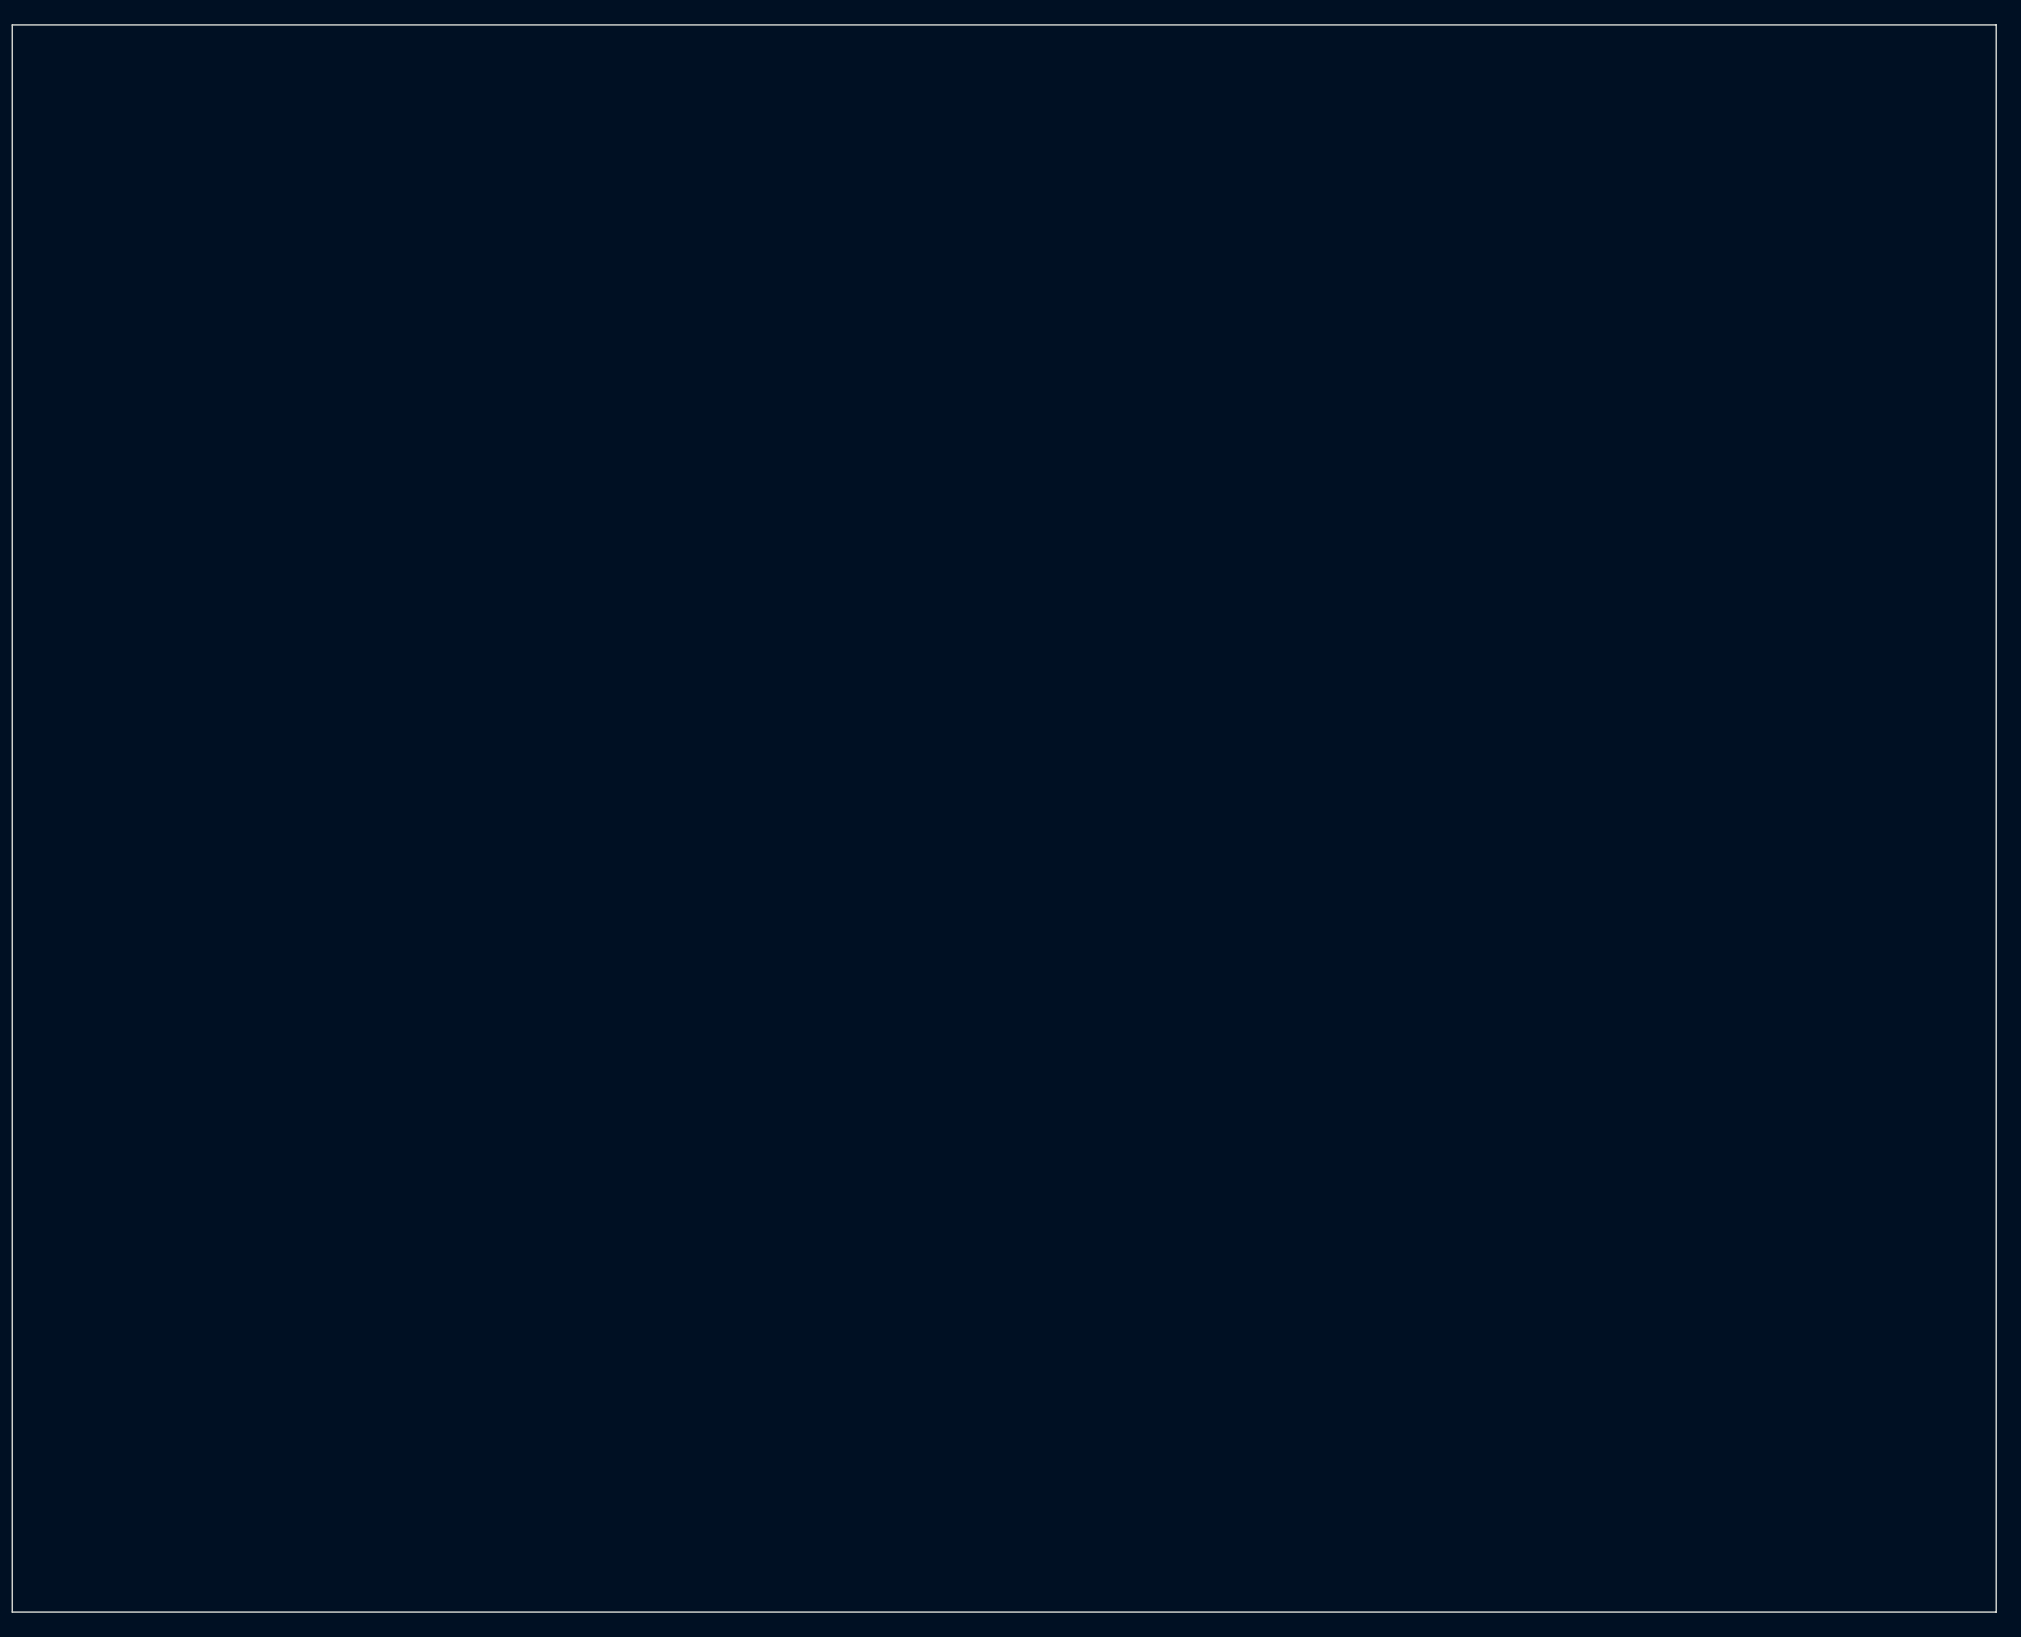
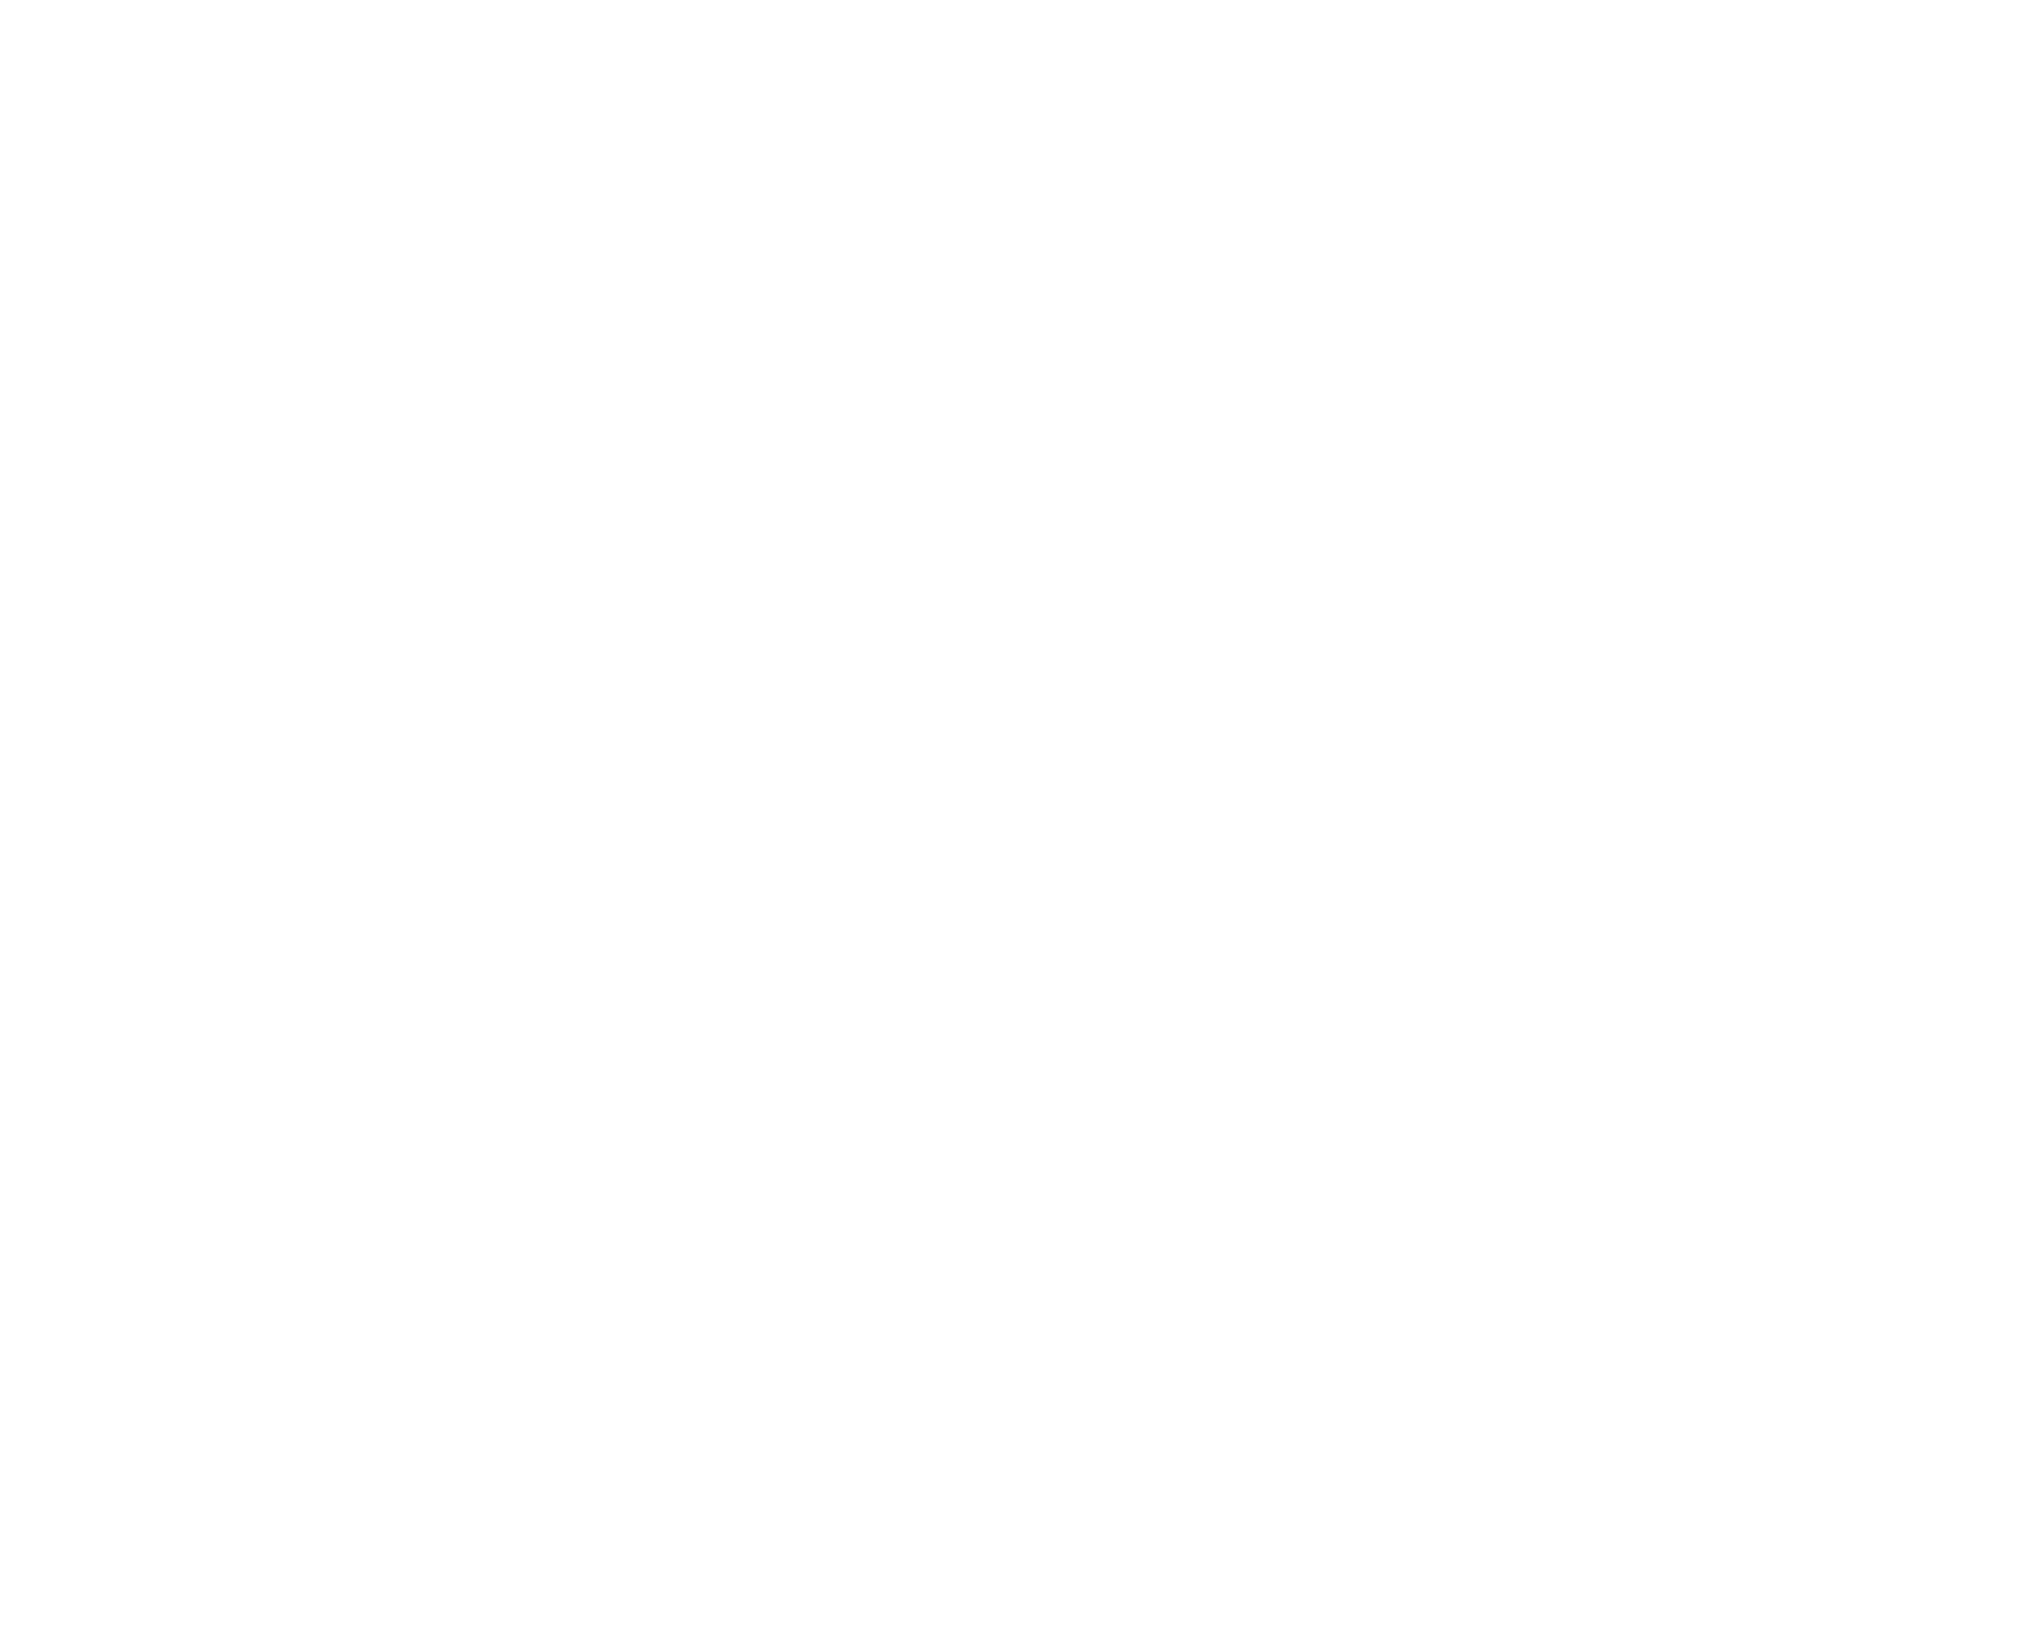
board edge: (12, 24) (12, 1612) (1996, 1612) (1996, 24) (12, 24) -> none

